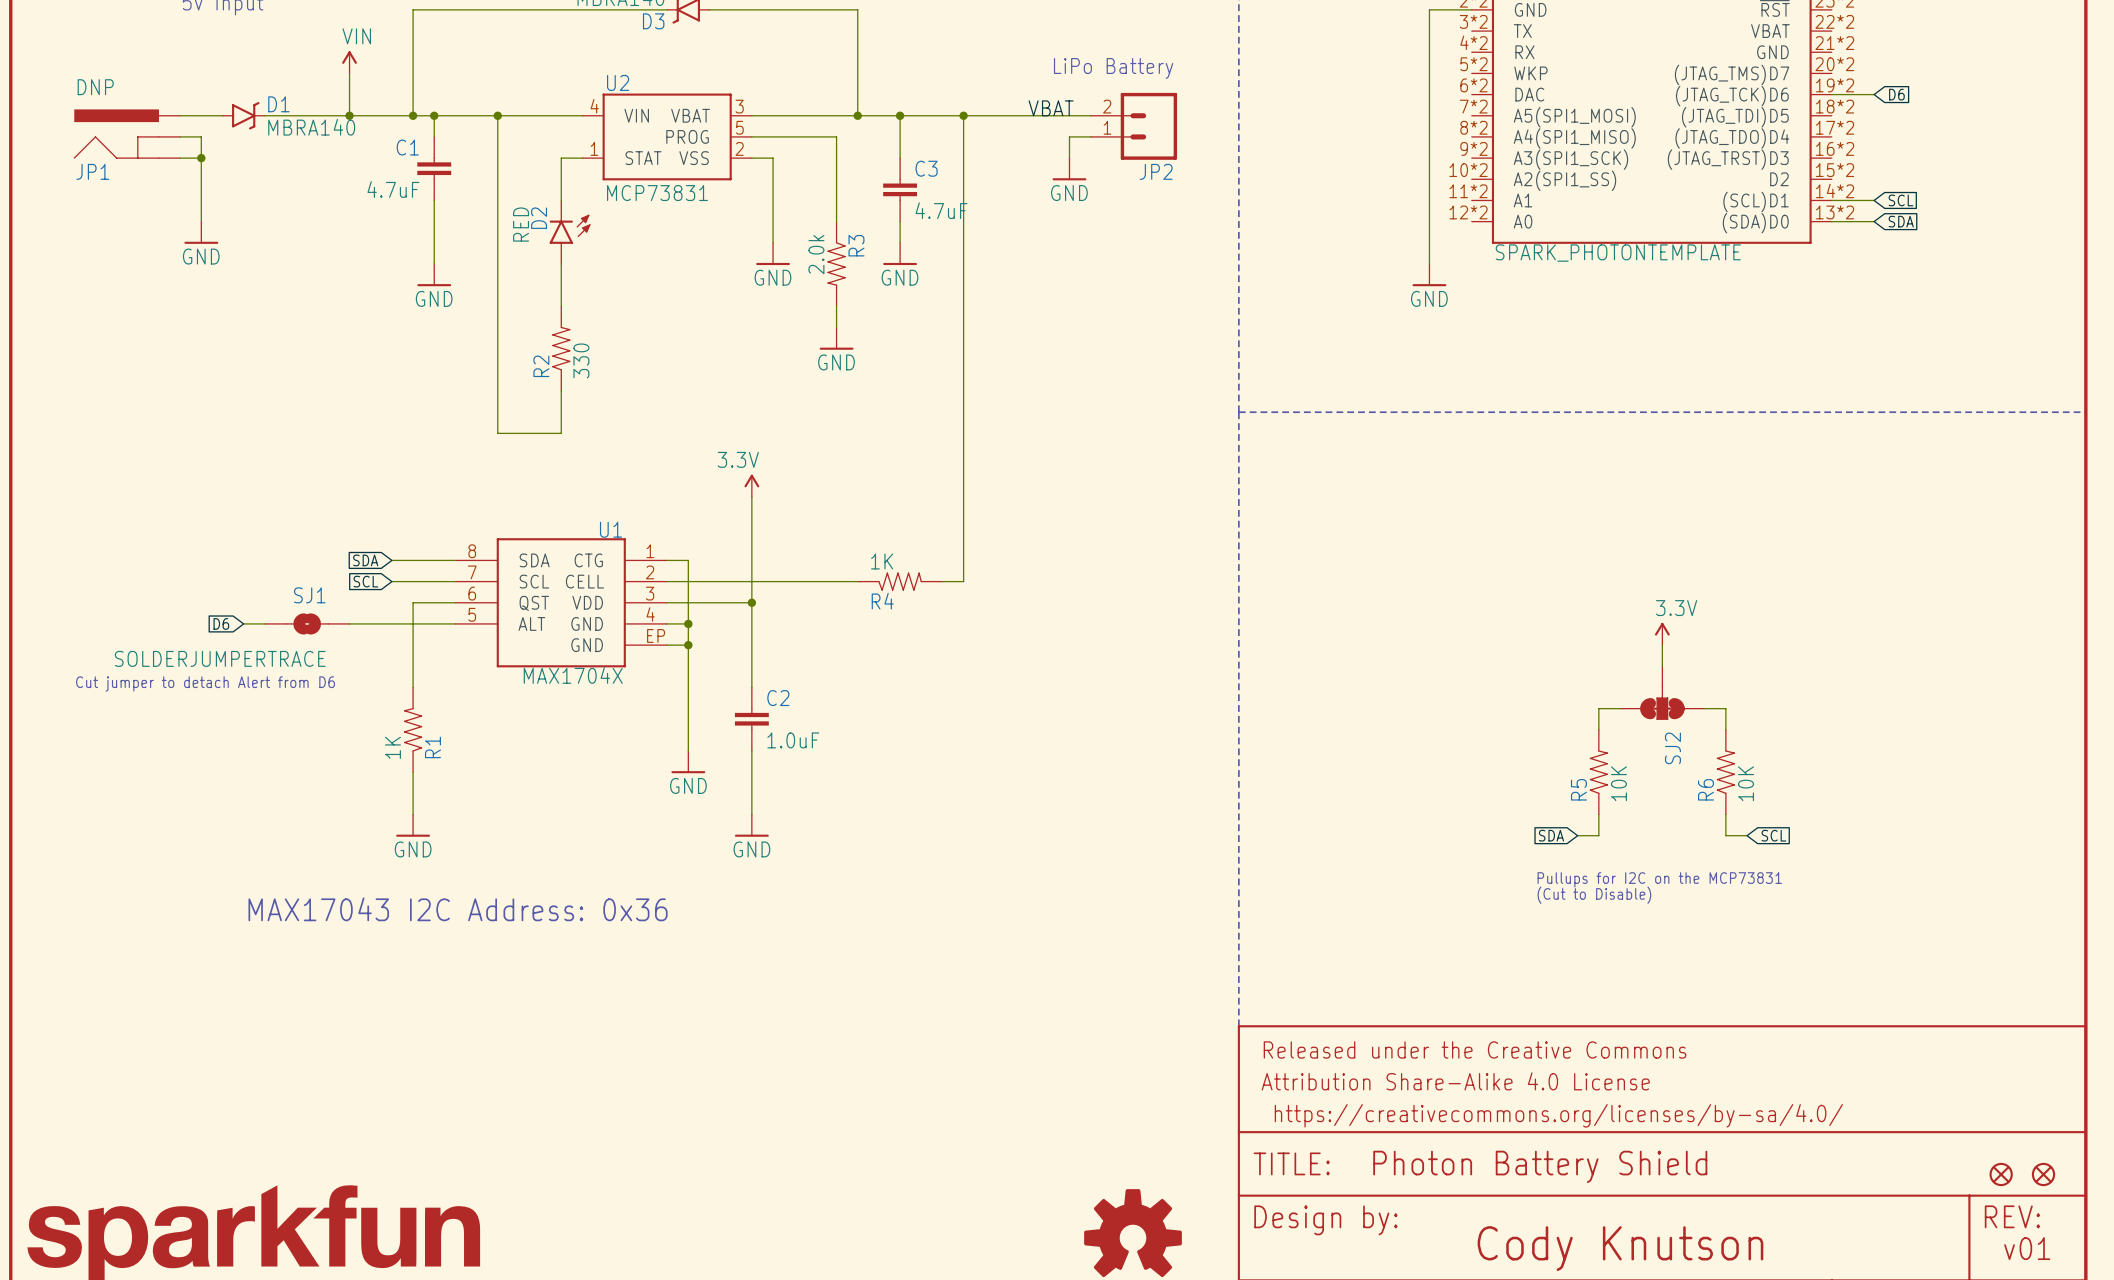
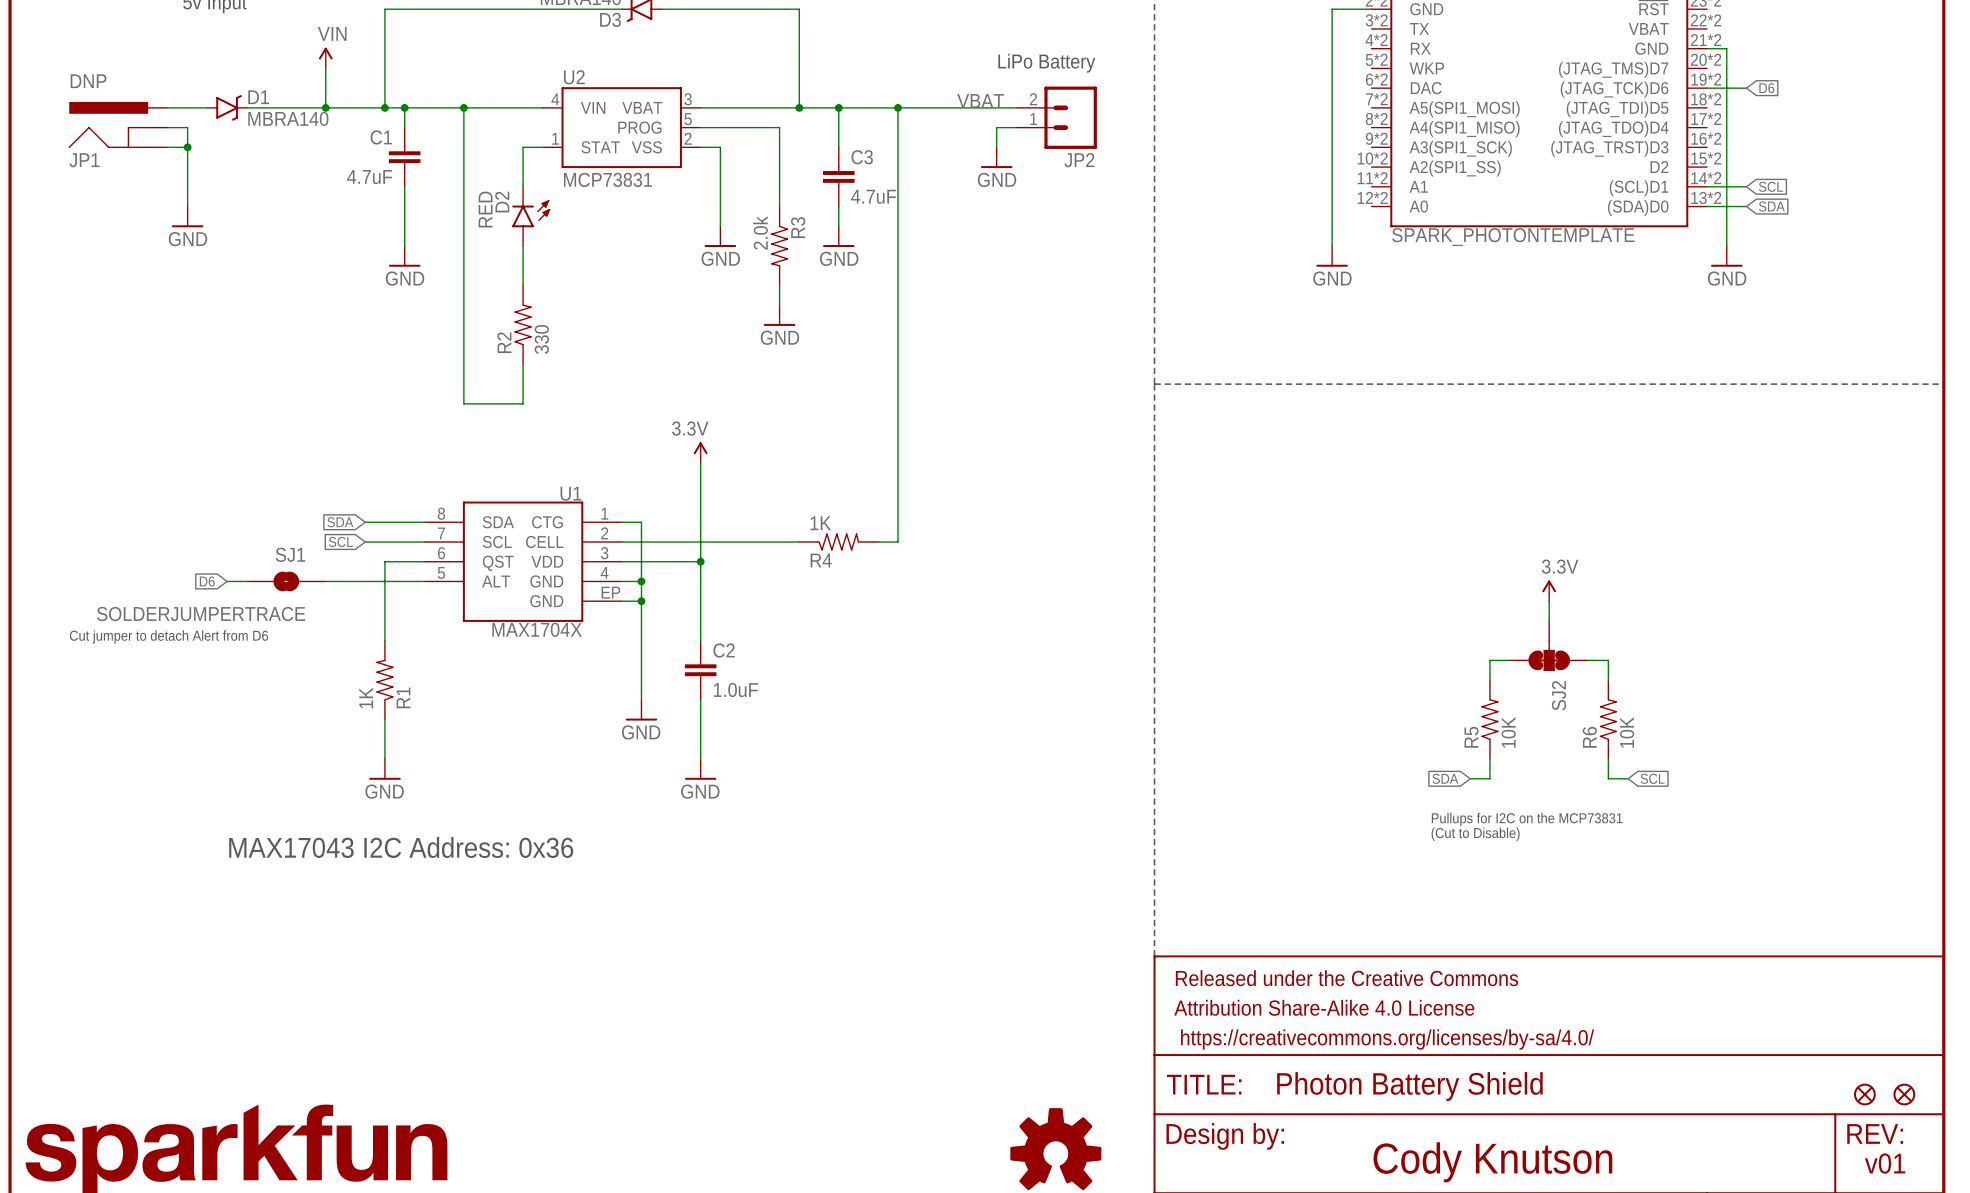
wire: none -> (1707, 48) (1726, 48) (1726, 246)
power symbol: none -> GND (1726, 256)

